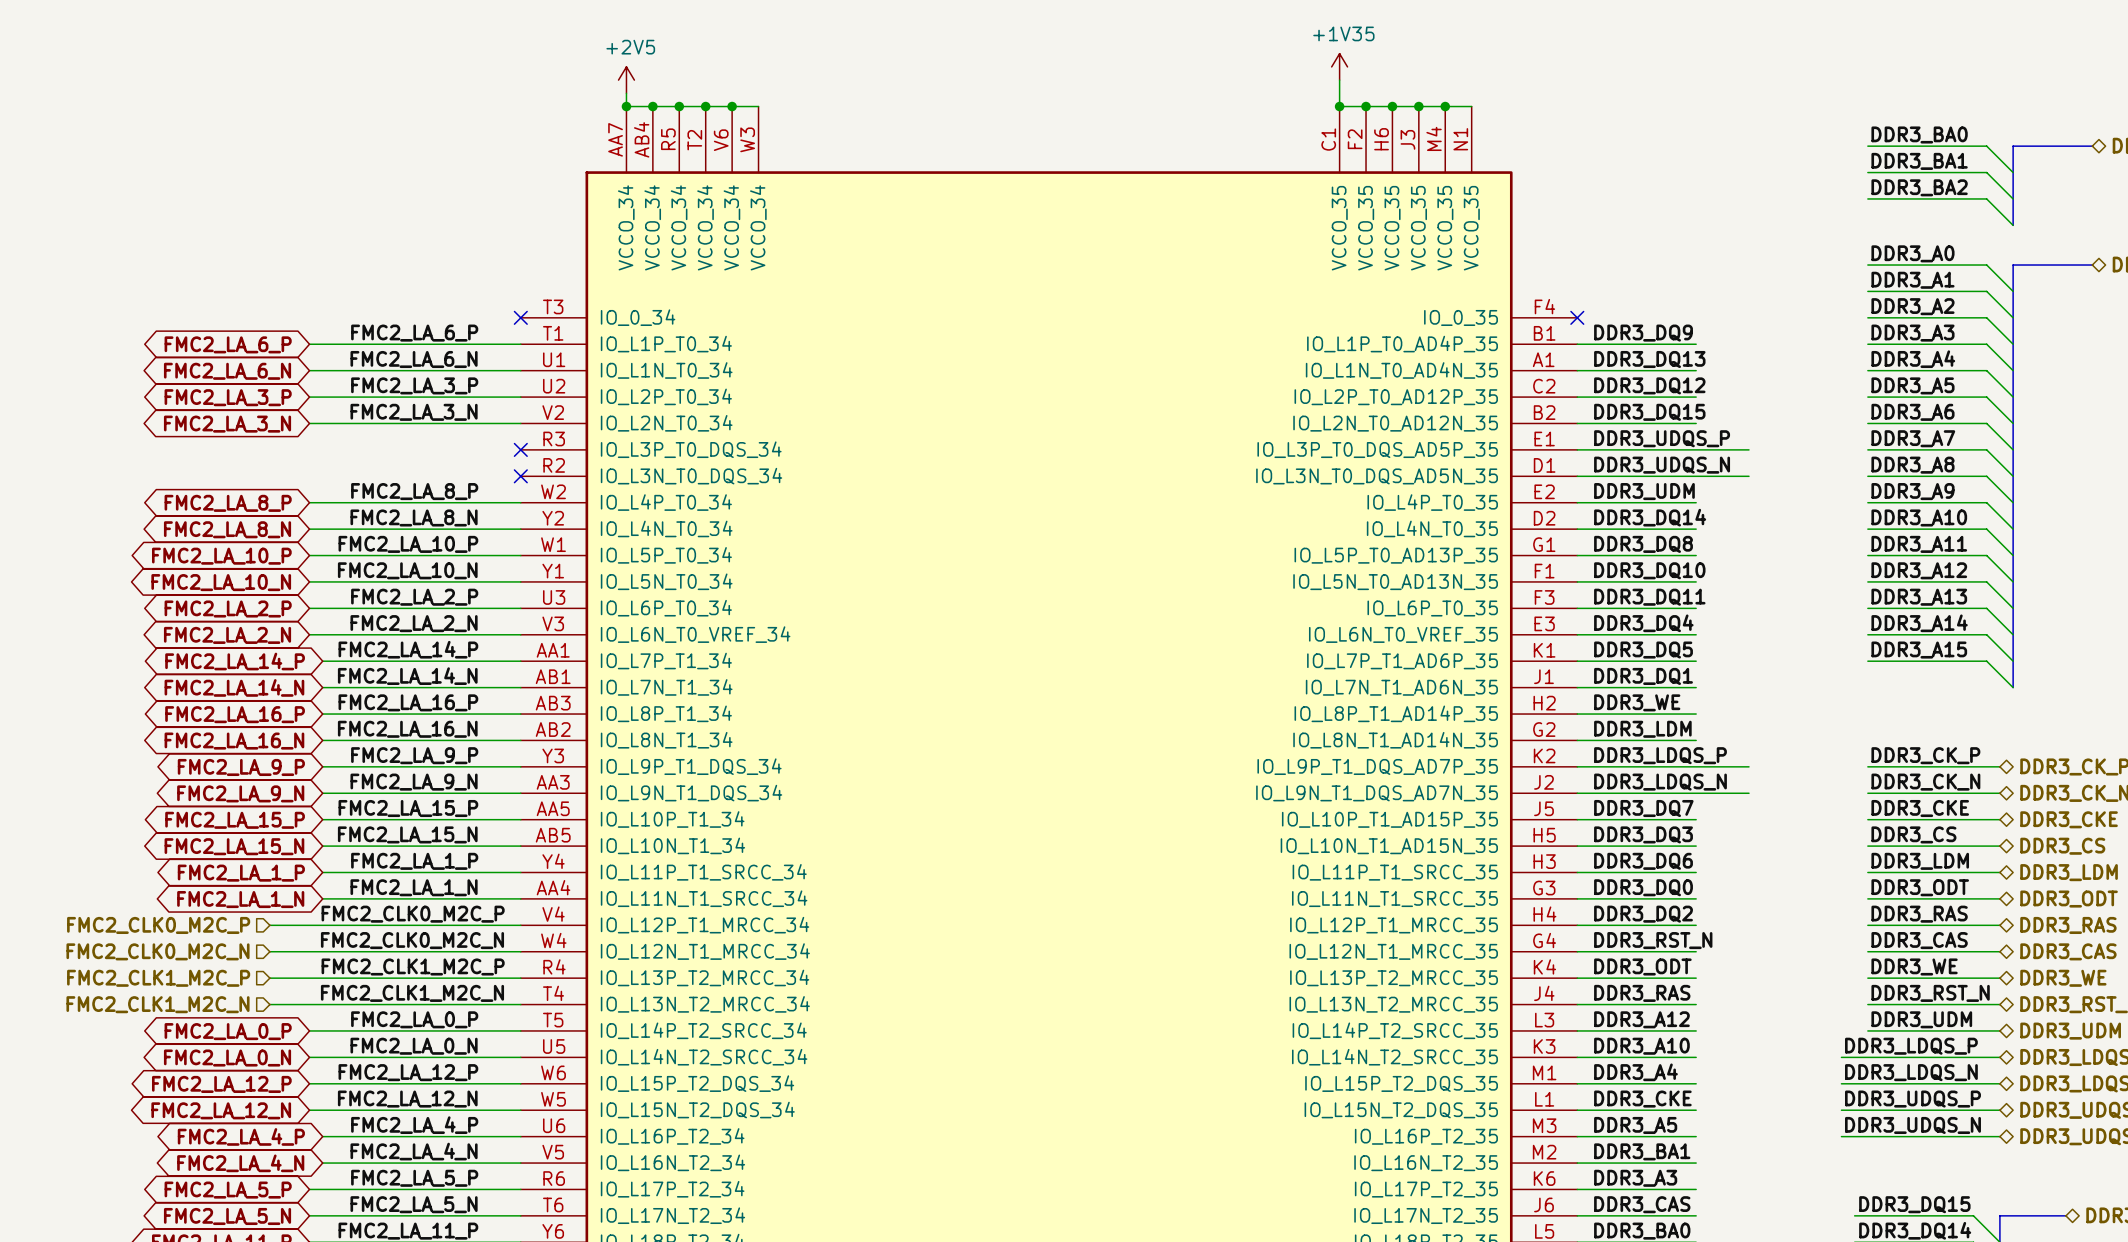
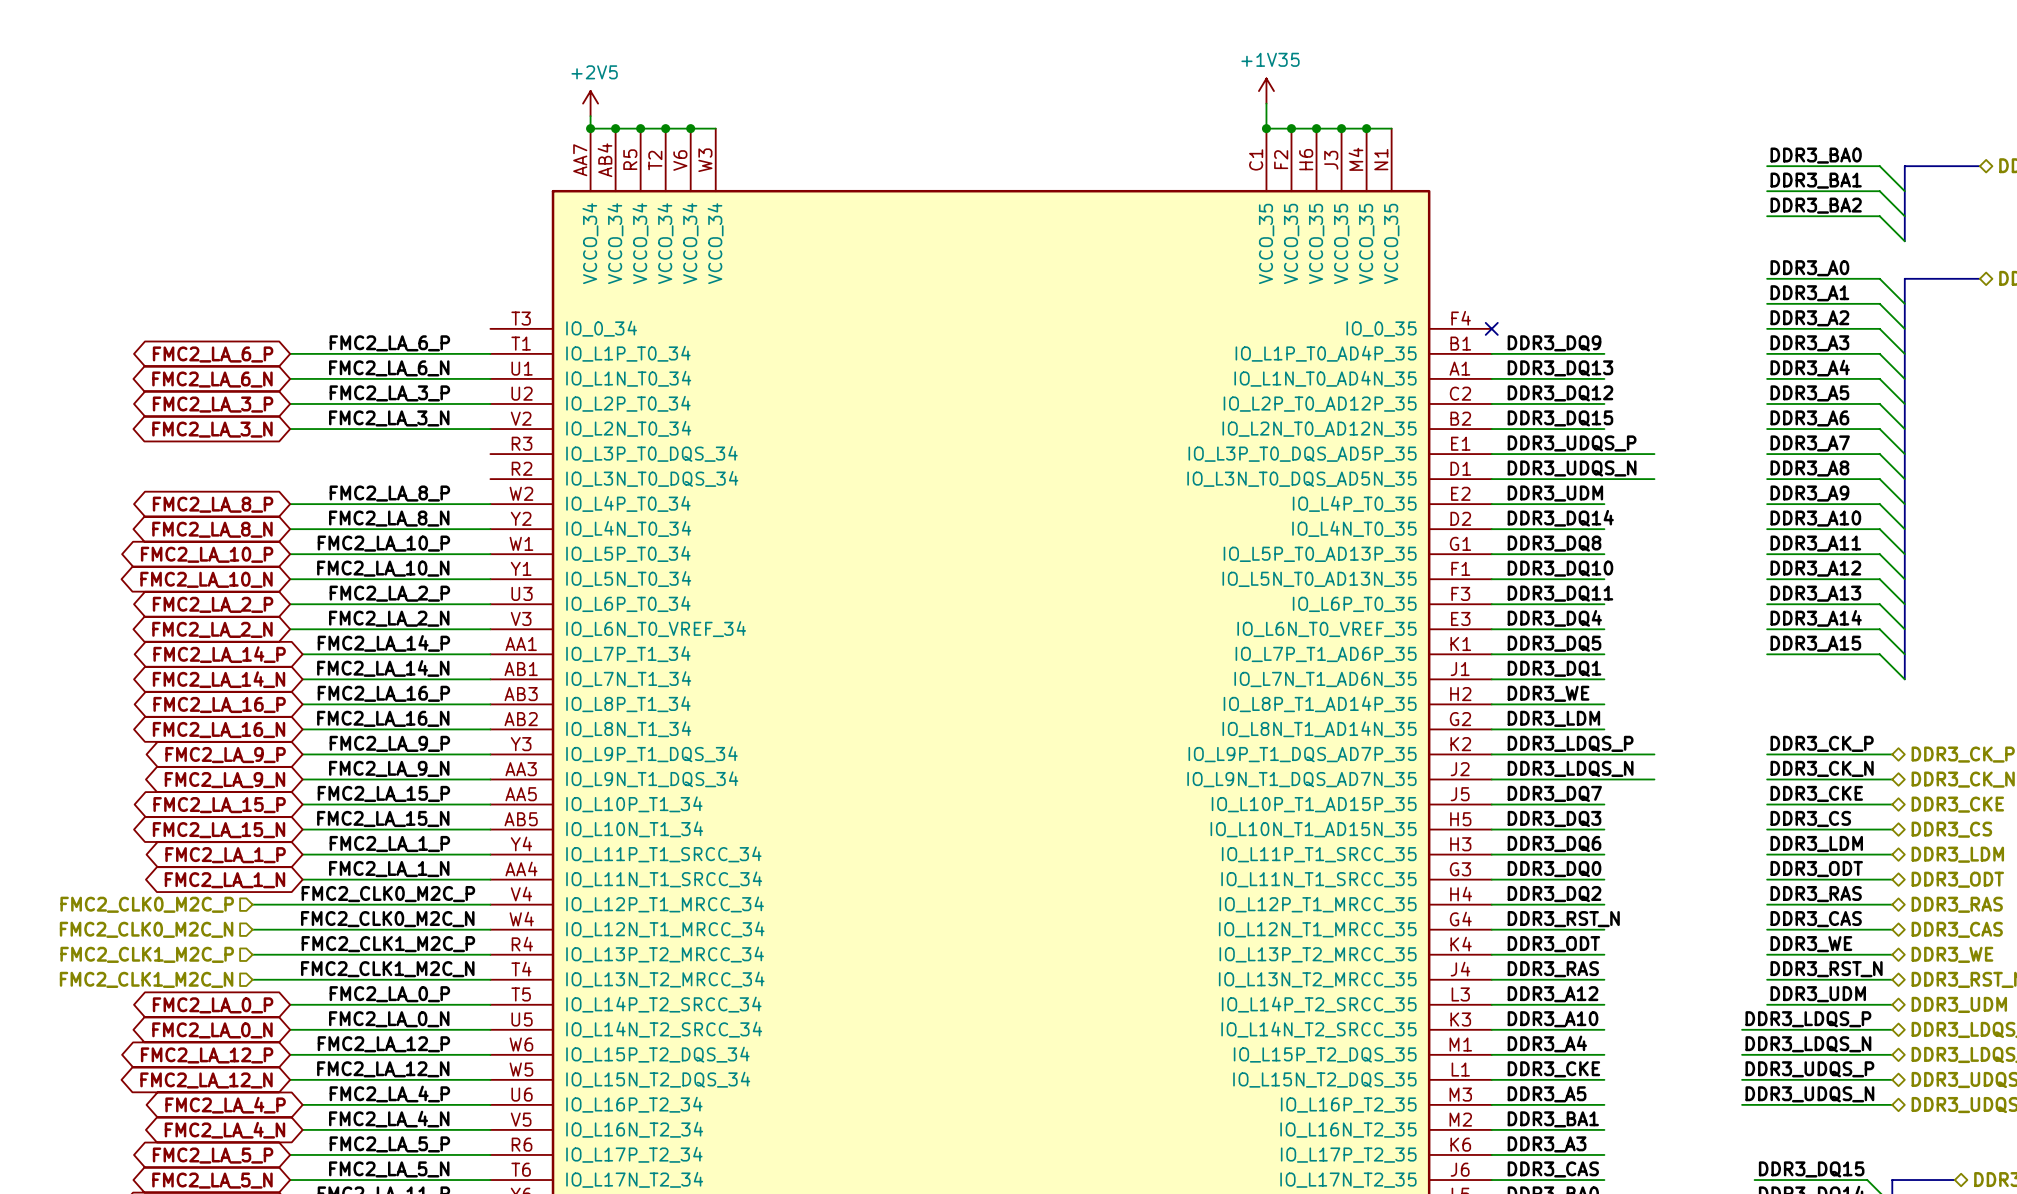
no-connect mark: (520, 317) -> none
no-connect mark: (520, 449) -> none
no-connect mark: (520, 476) -> none

